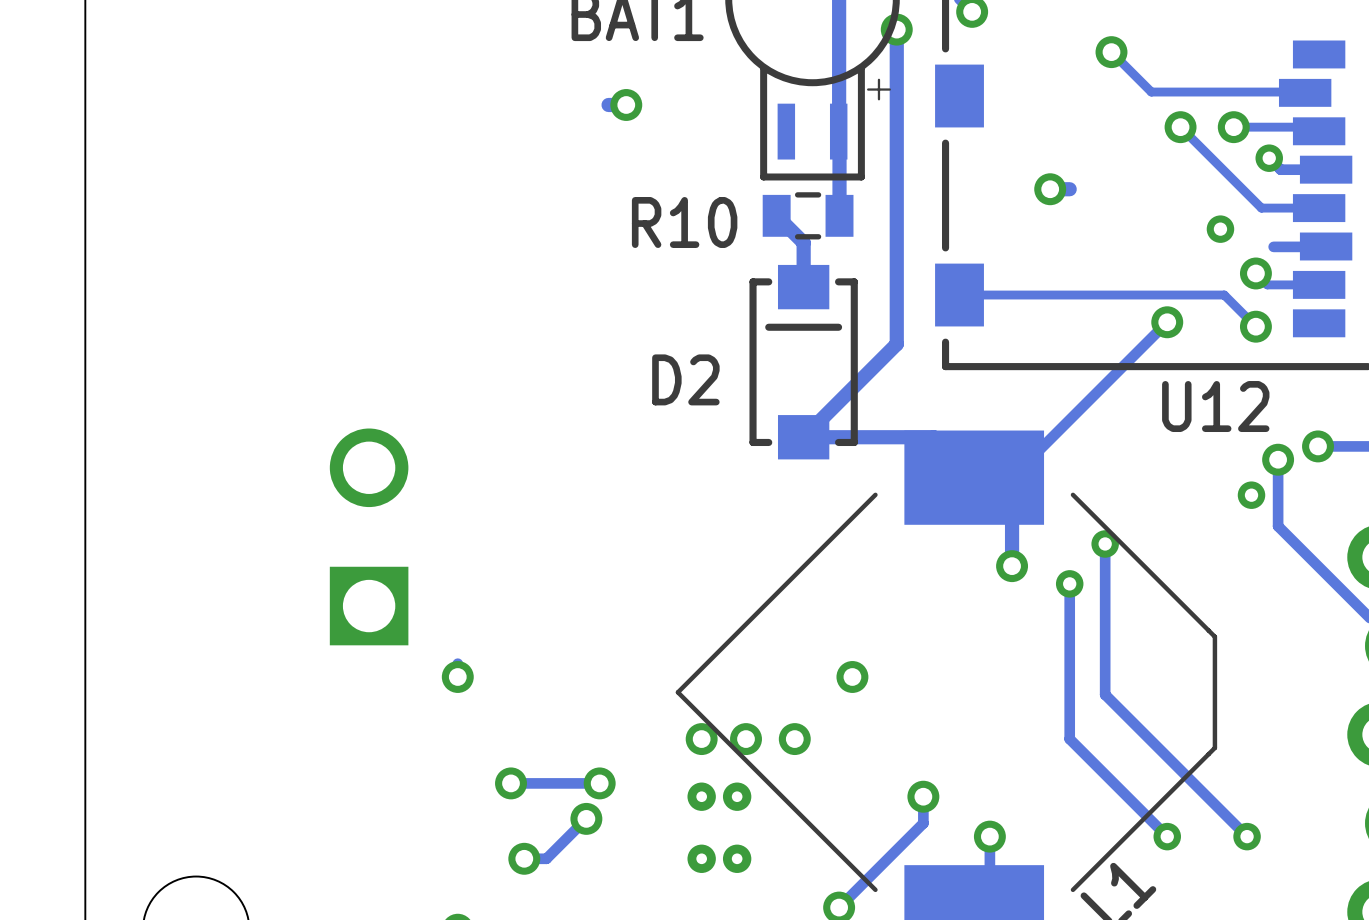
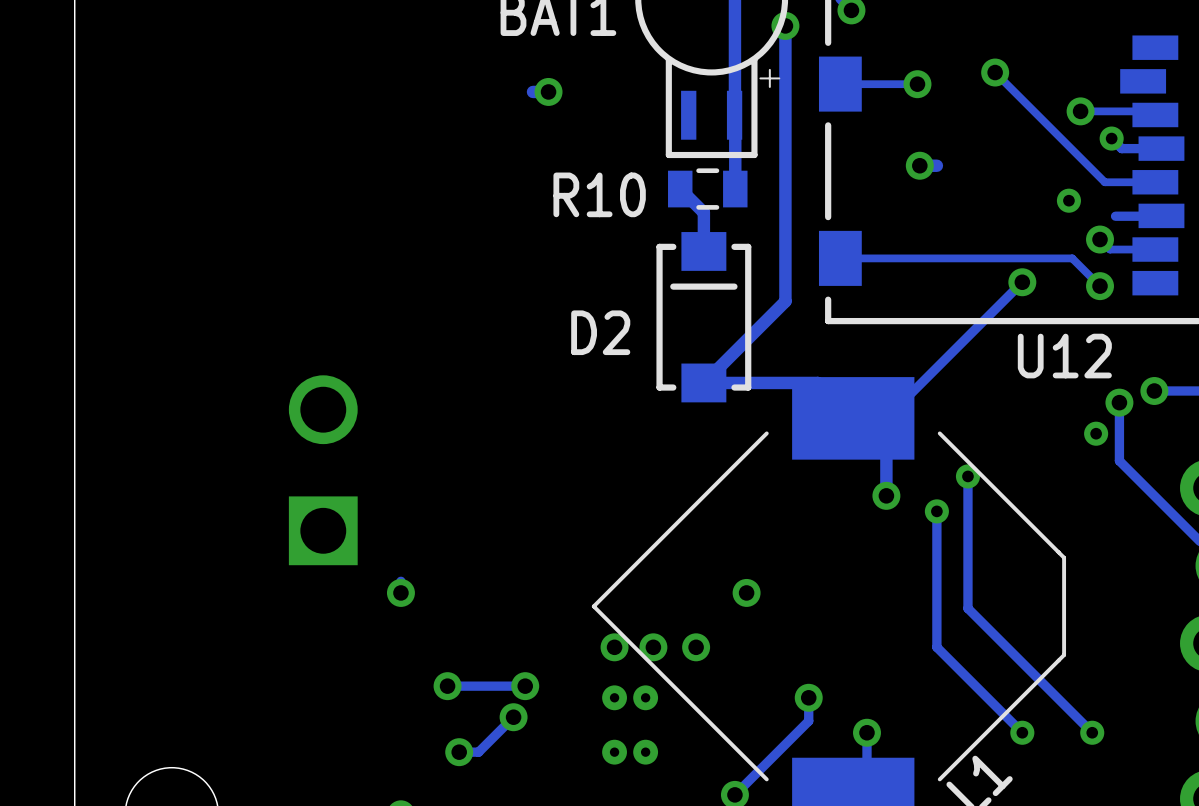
track: (1111, 52) (1151, 92) (1305, 92) -> none
via: (1111, 52) -> none
track: none -> (995, 72) (1033, 111)
via: none -> (995, 72)
track: none -> (917, 84) (839, 84) (839, 88)
via: none -> (917, 84)
via: (1180, 127) -> none

